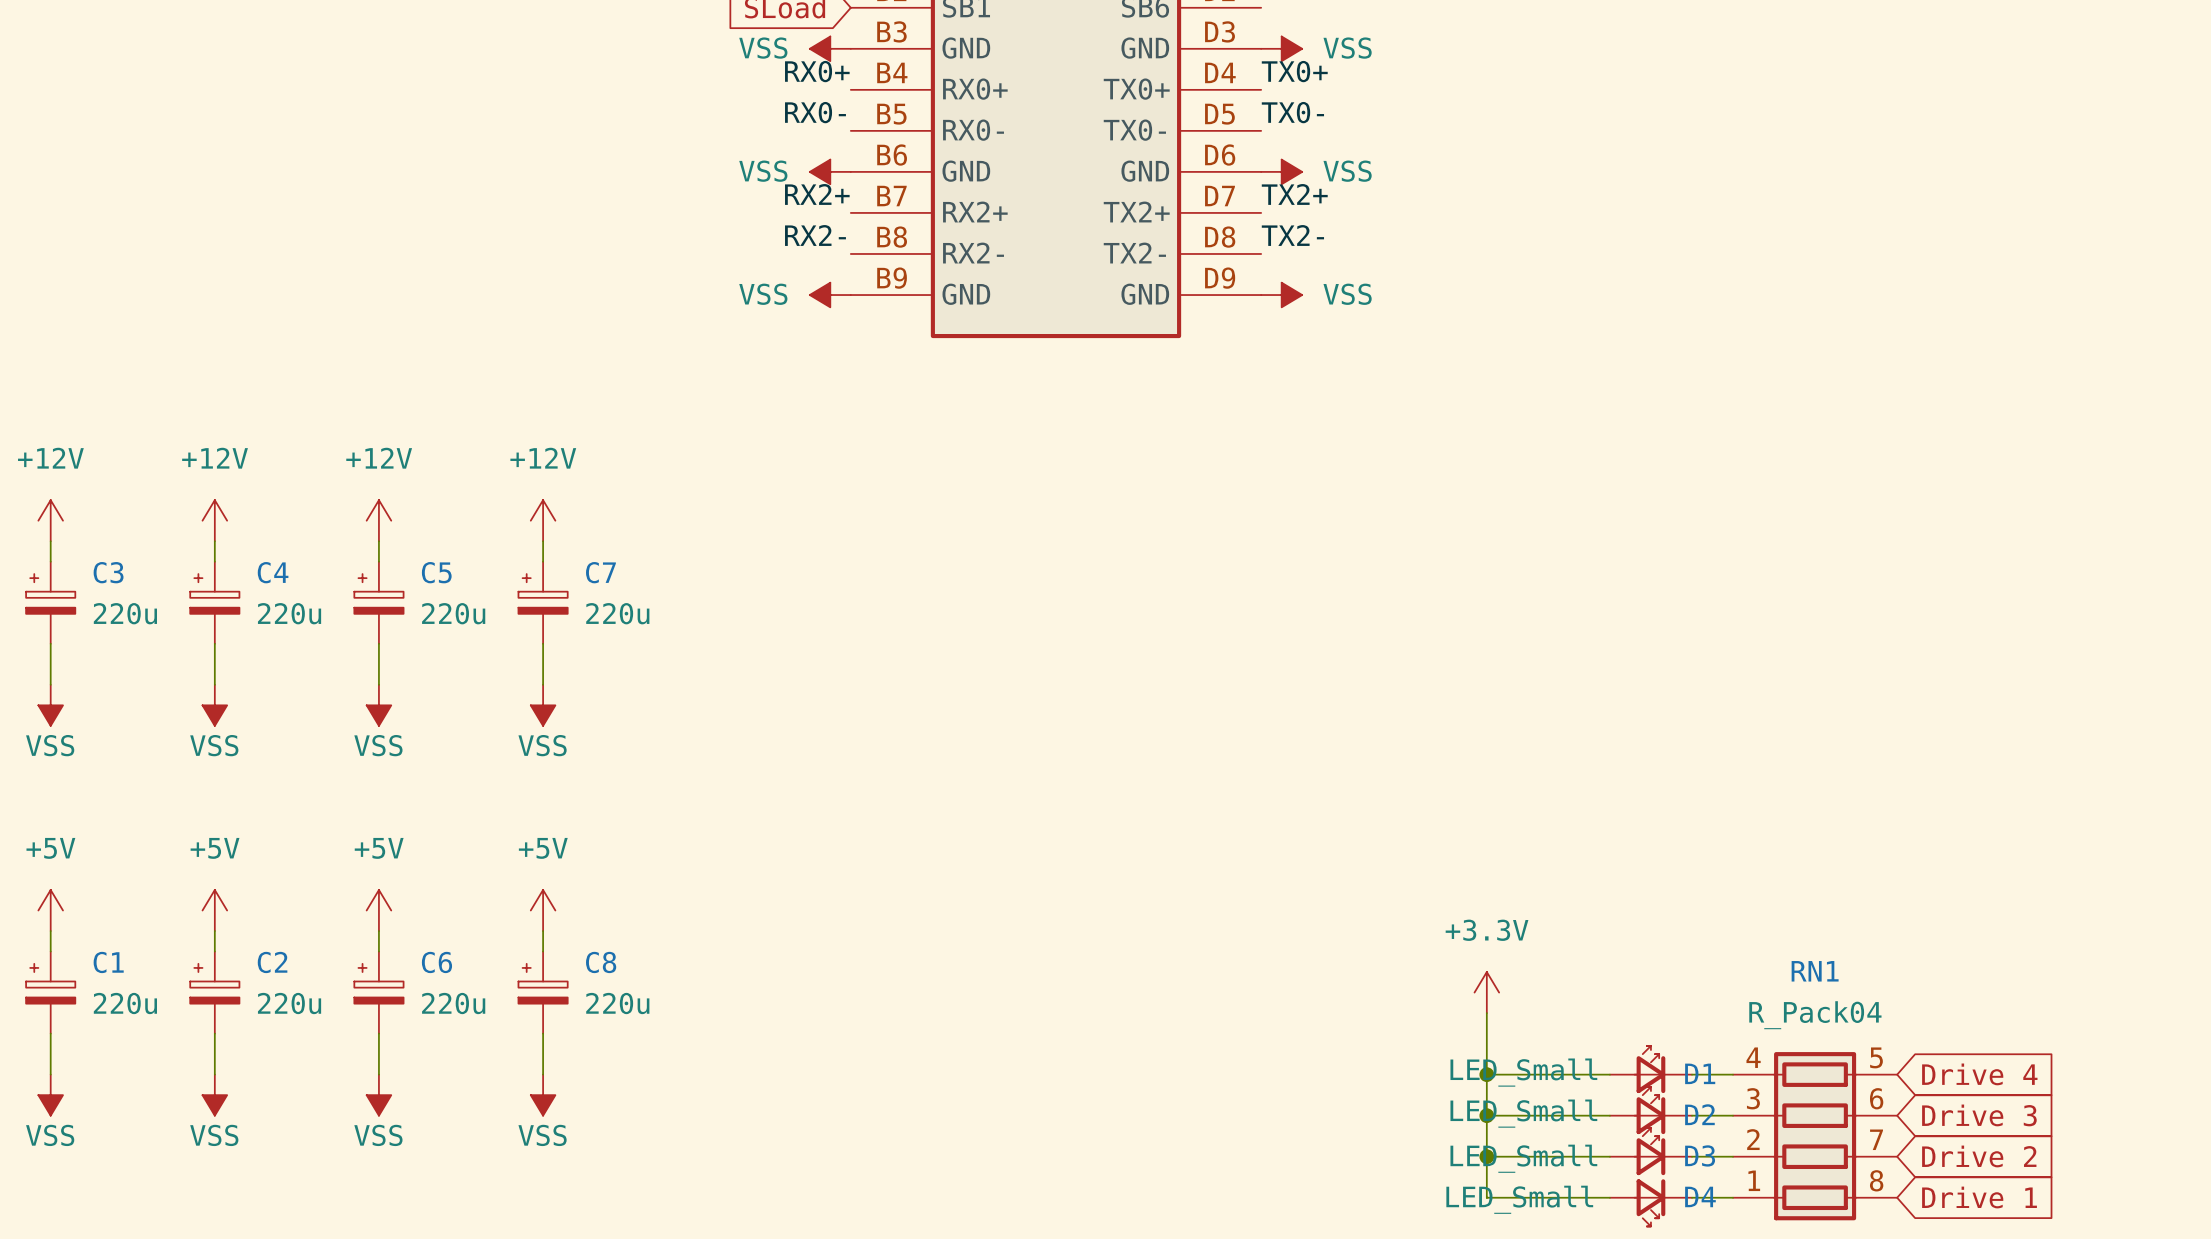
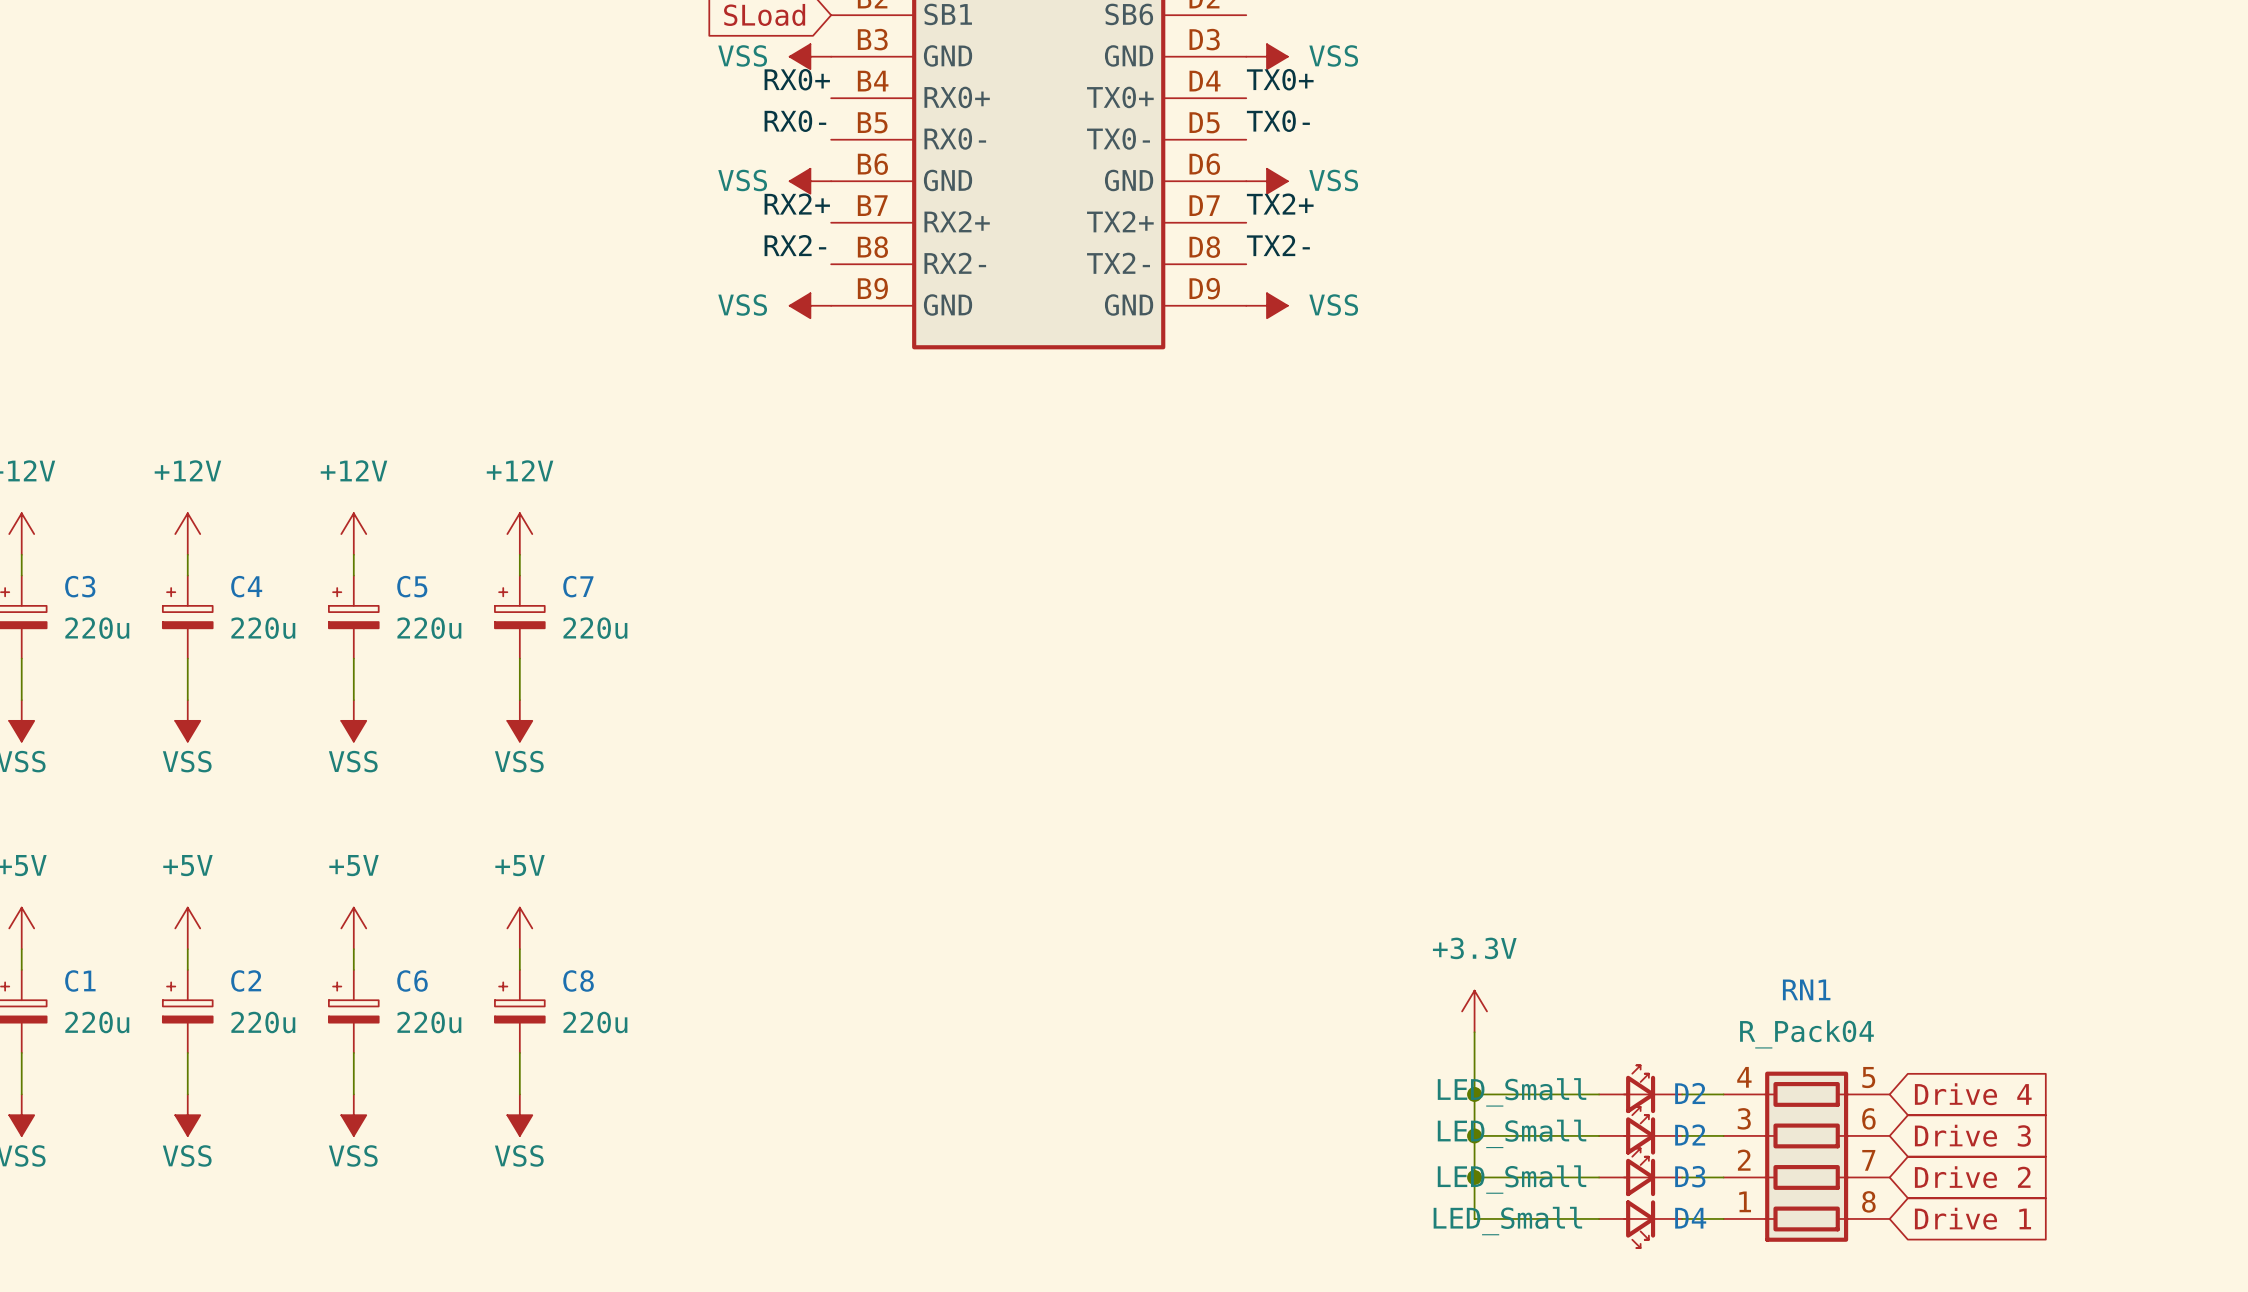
D1 name: D1 (1700, 1073) -> D2 (1690, 1093)

